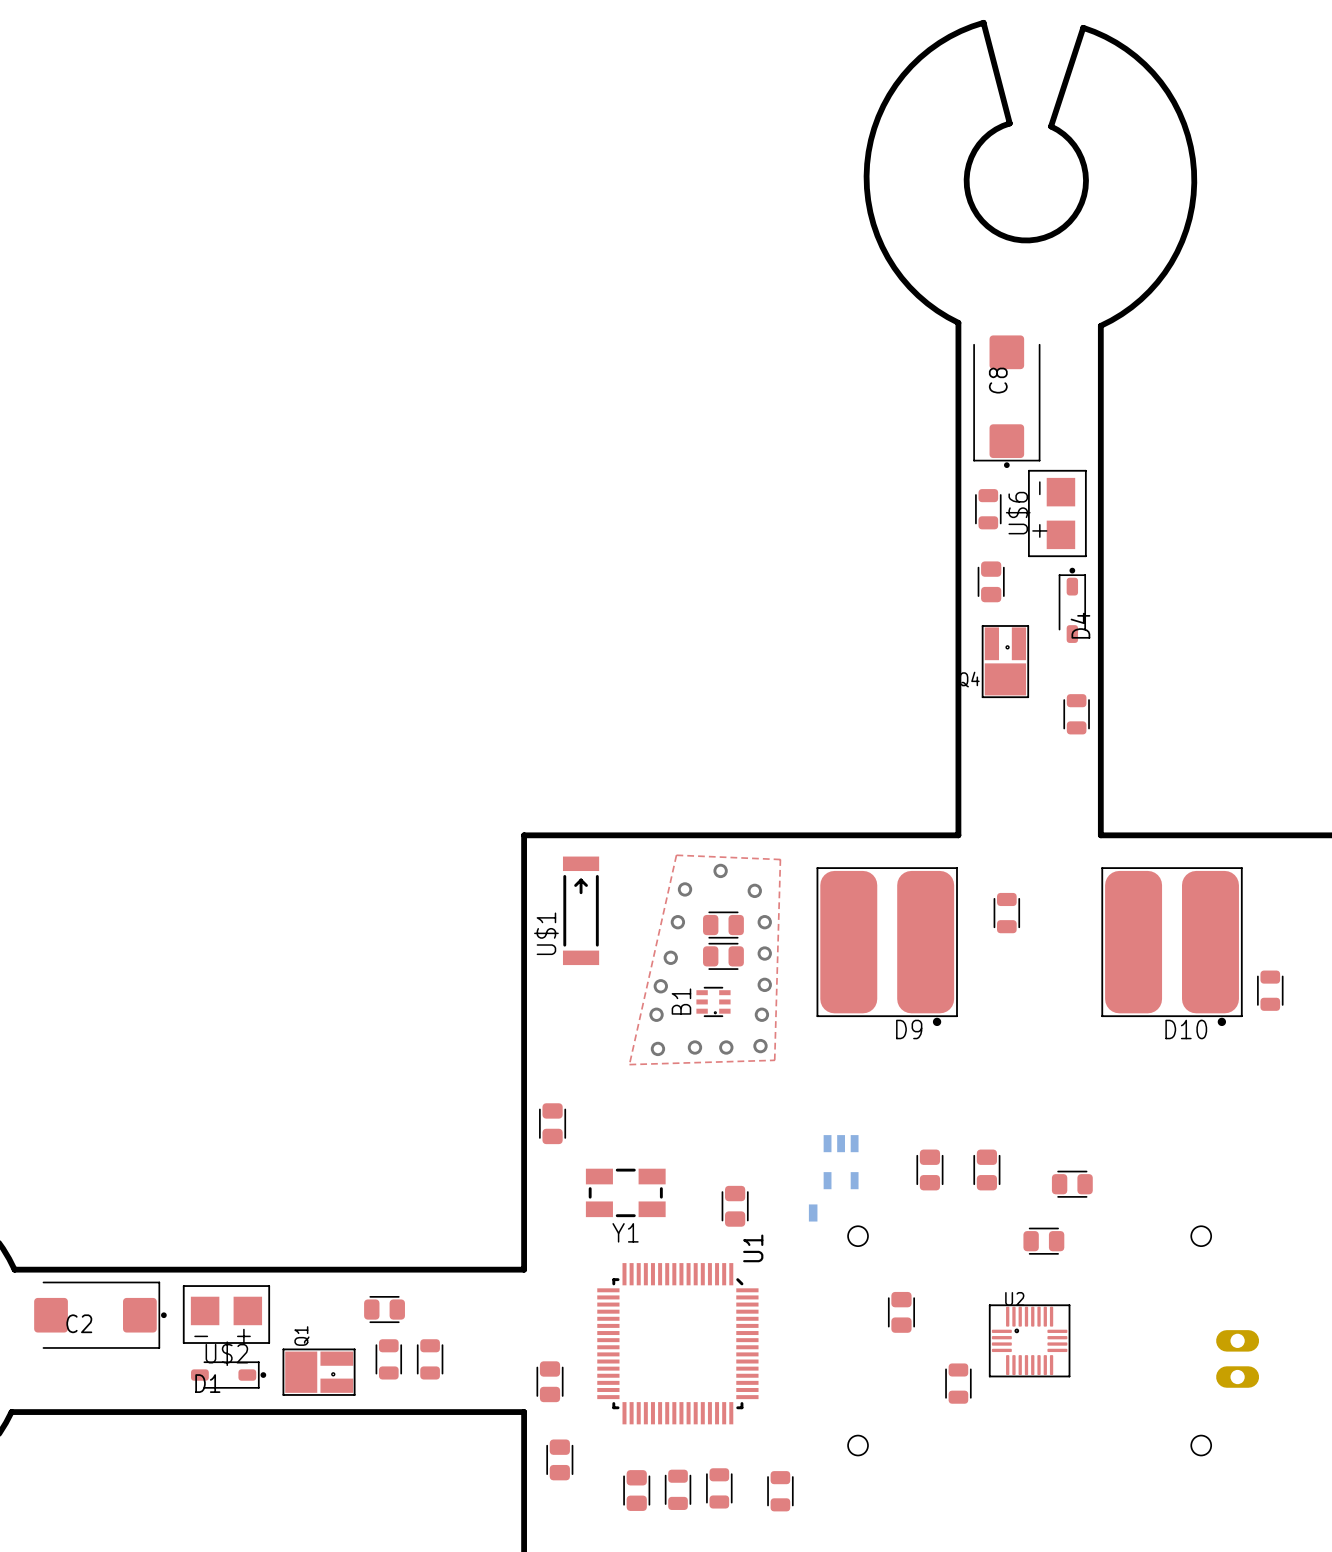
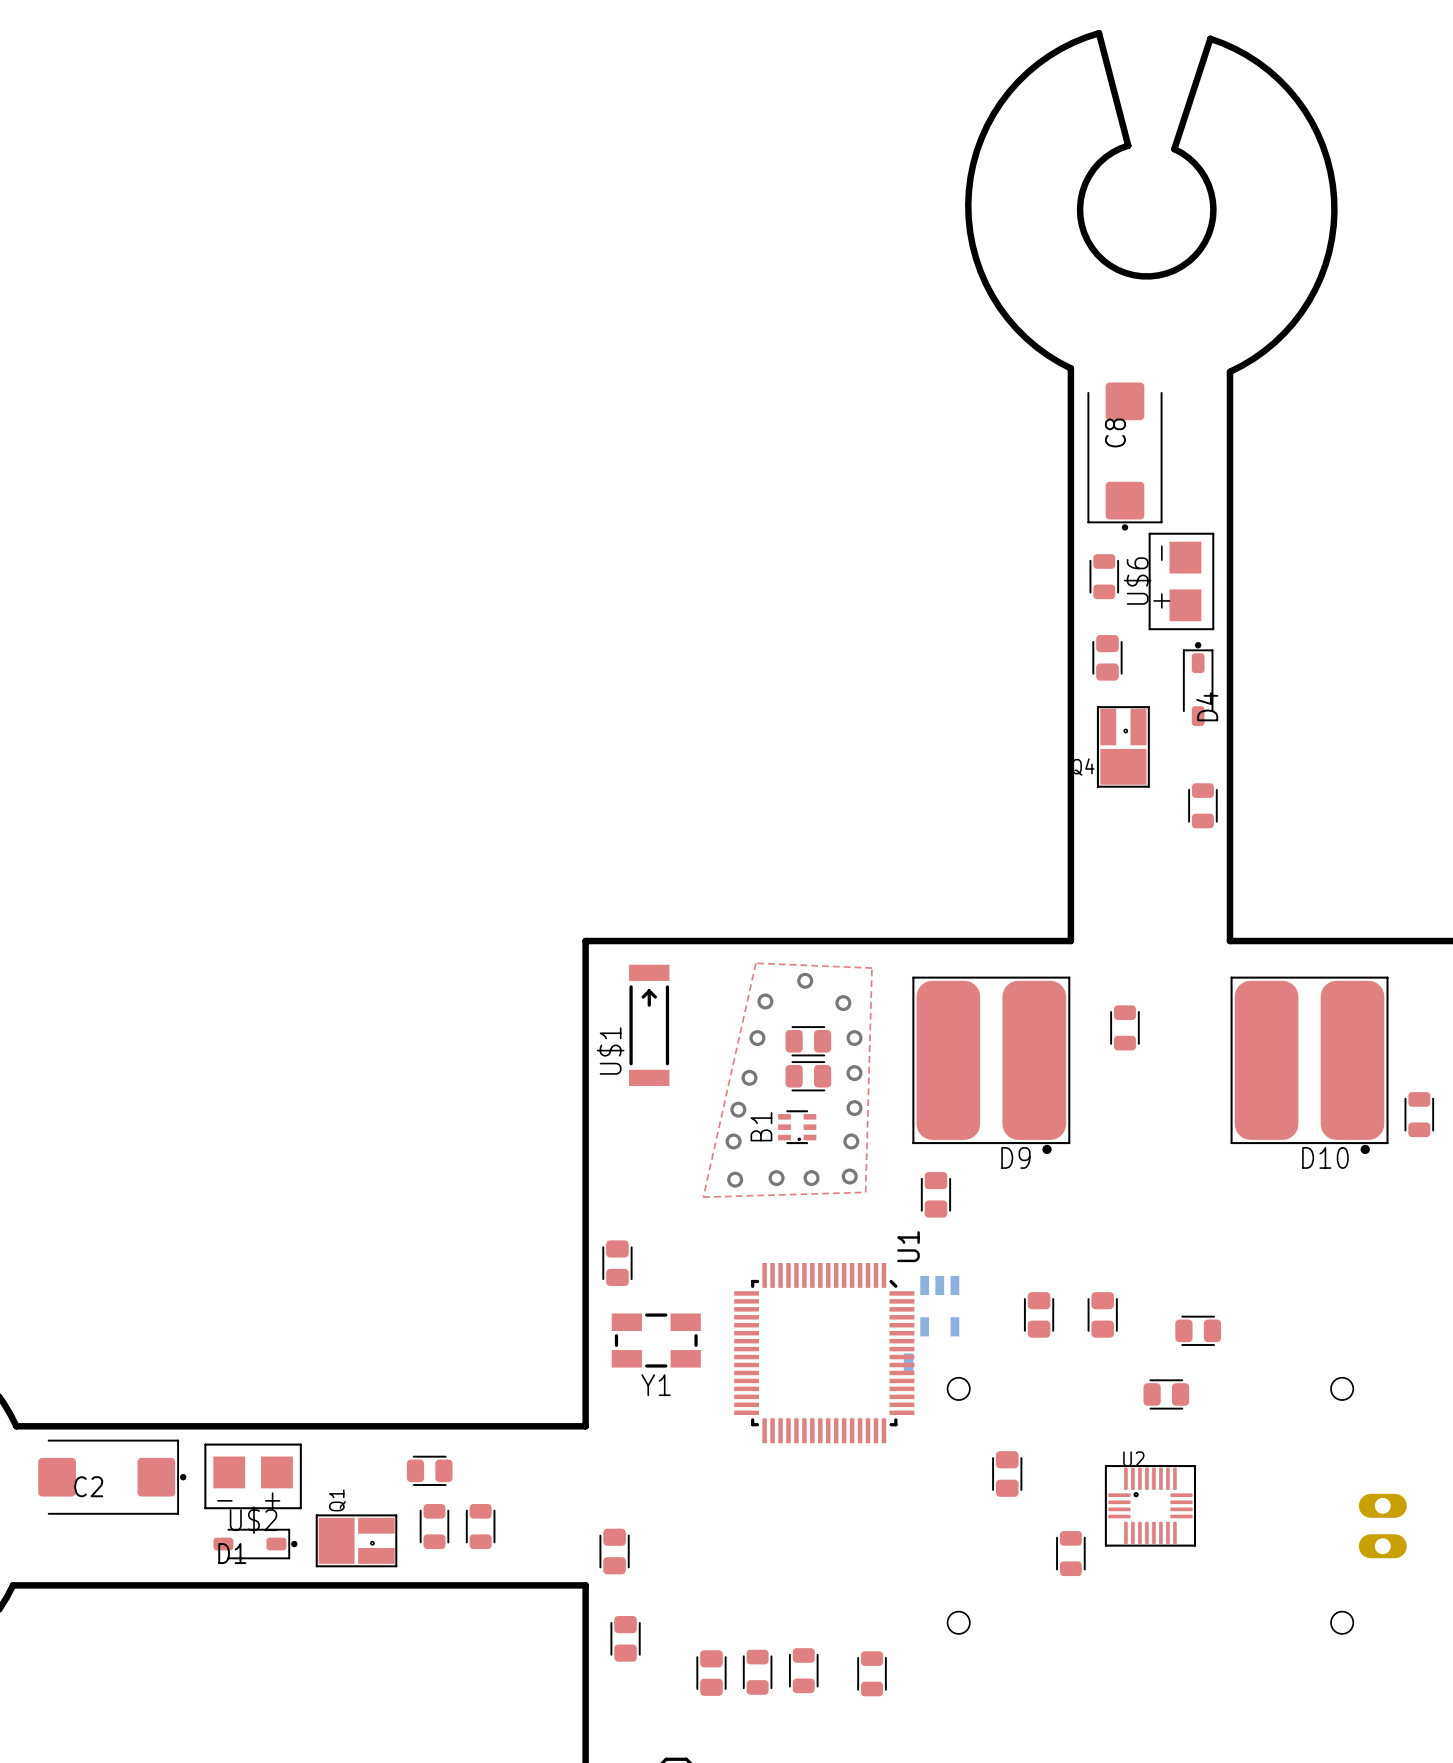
Y1 position: (625, 1192) -> (656, 1340)
part position: (735, 1206) -> (935, 1194)
U1 position: (677, 1343) -> (824, 1353)

